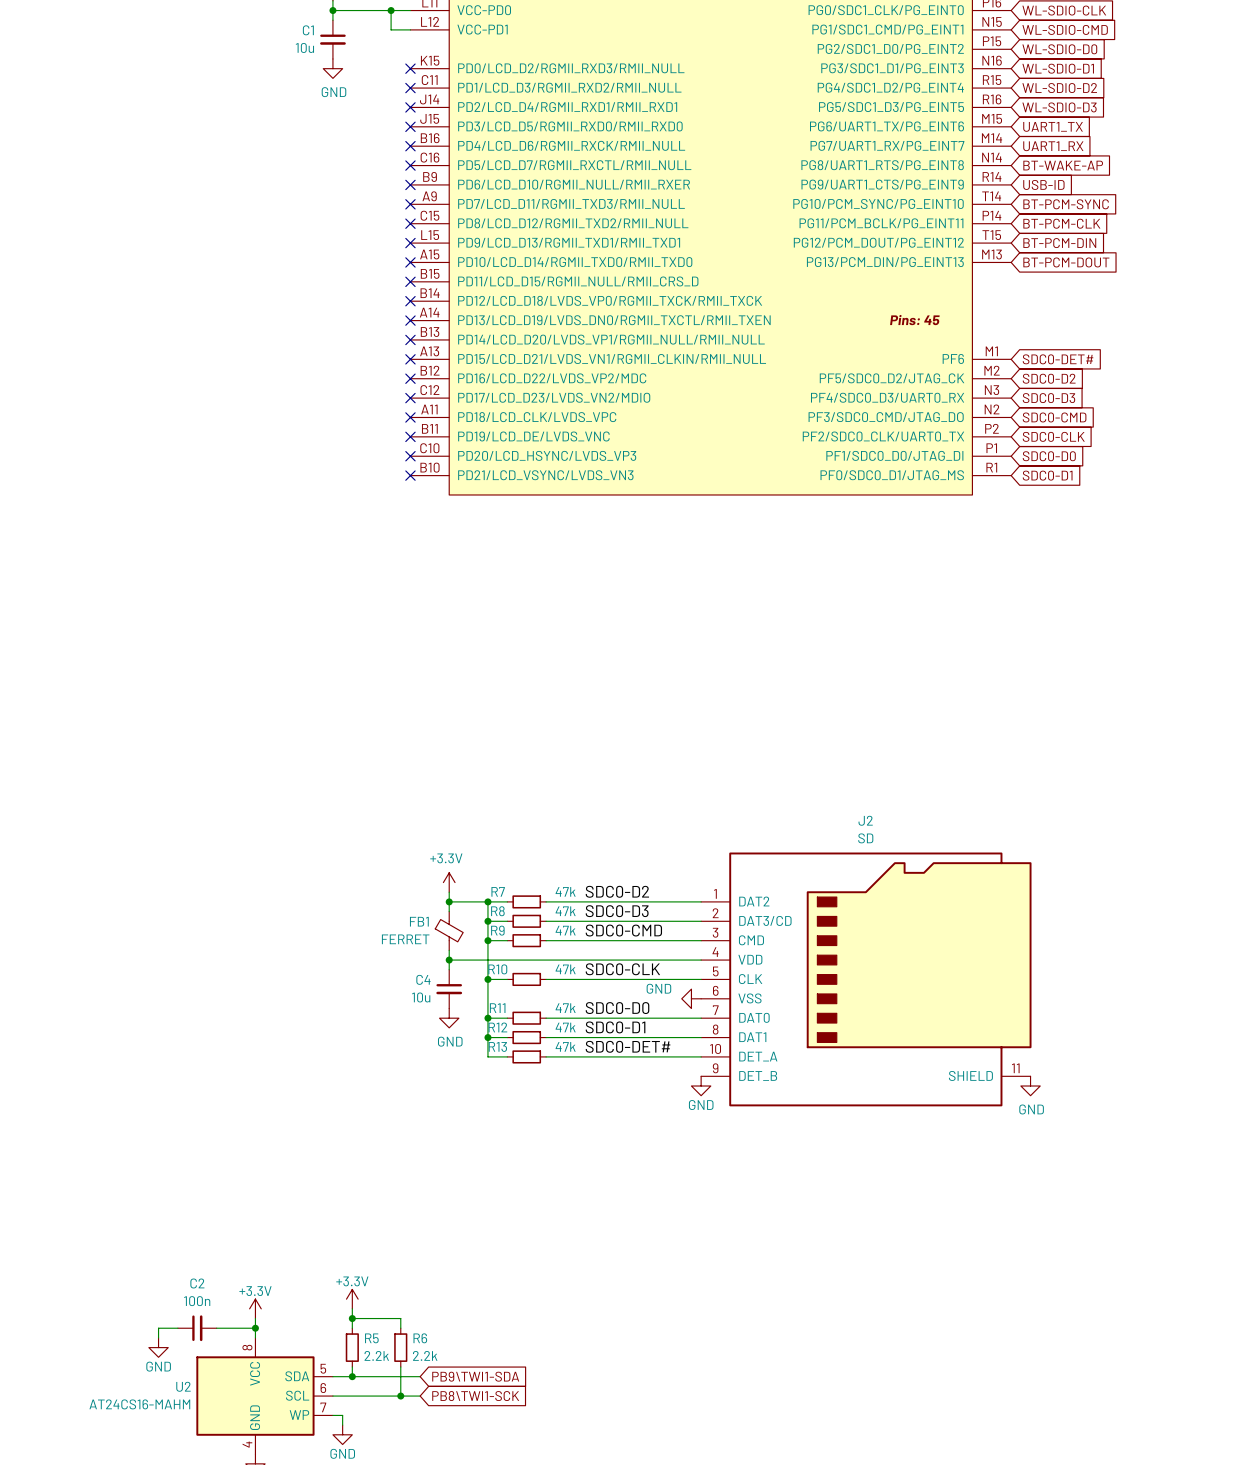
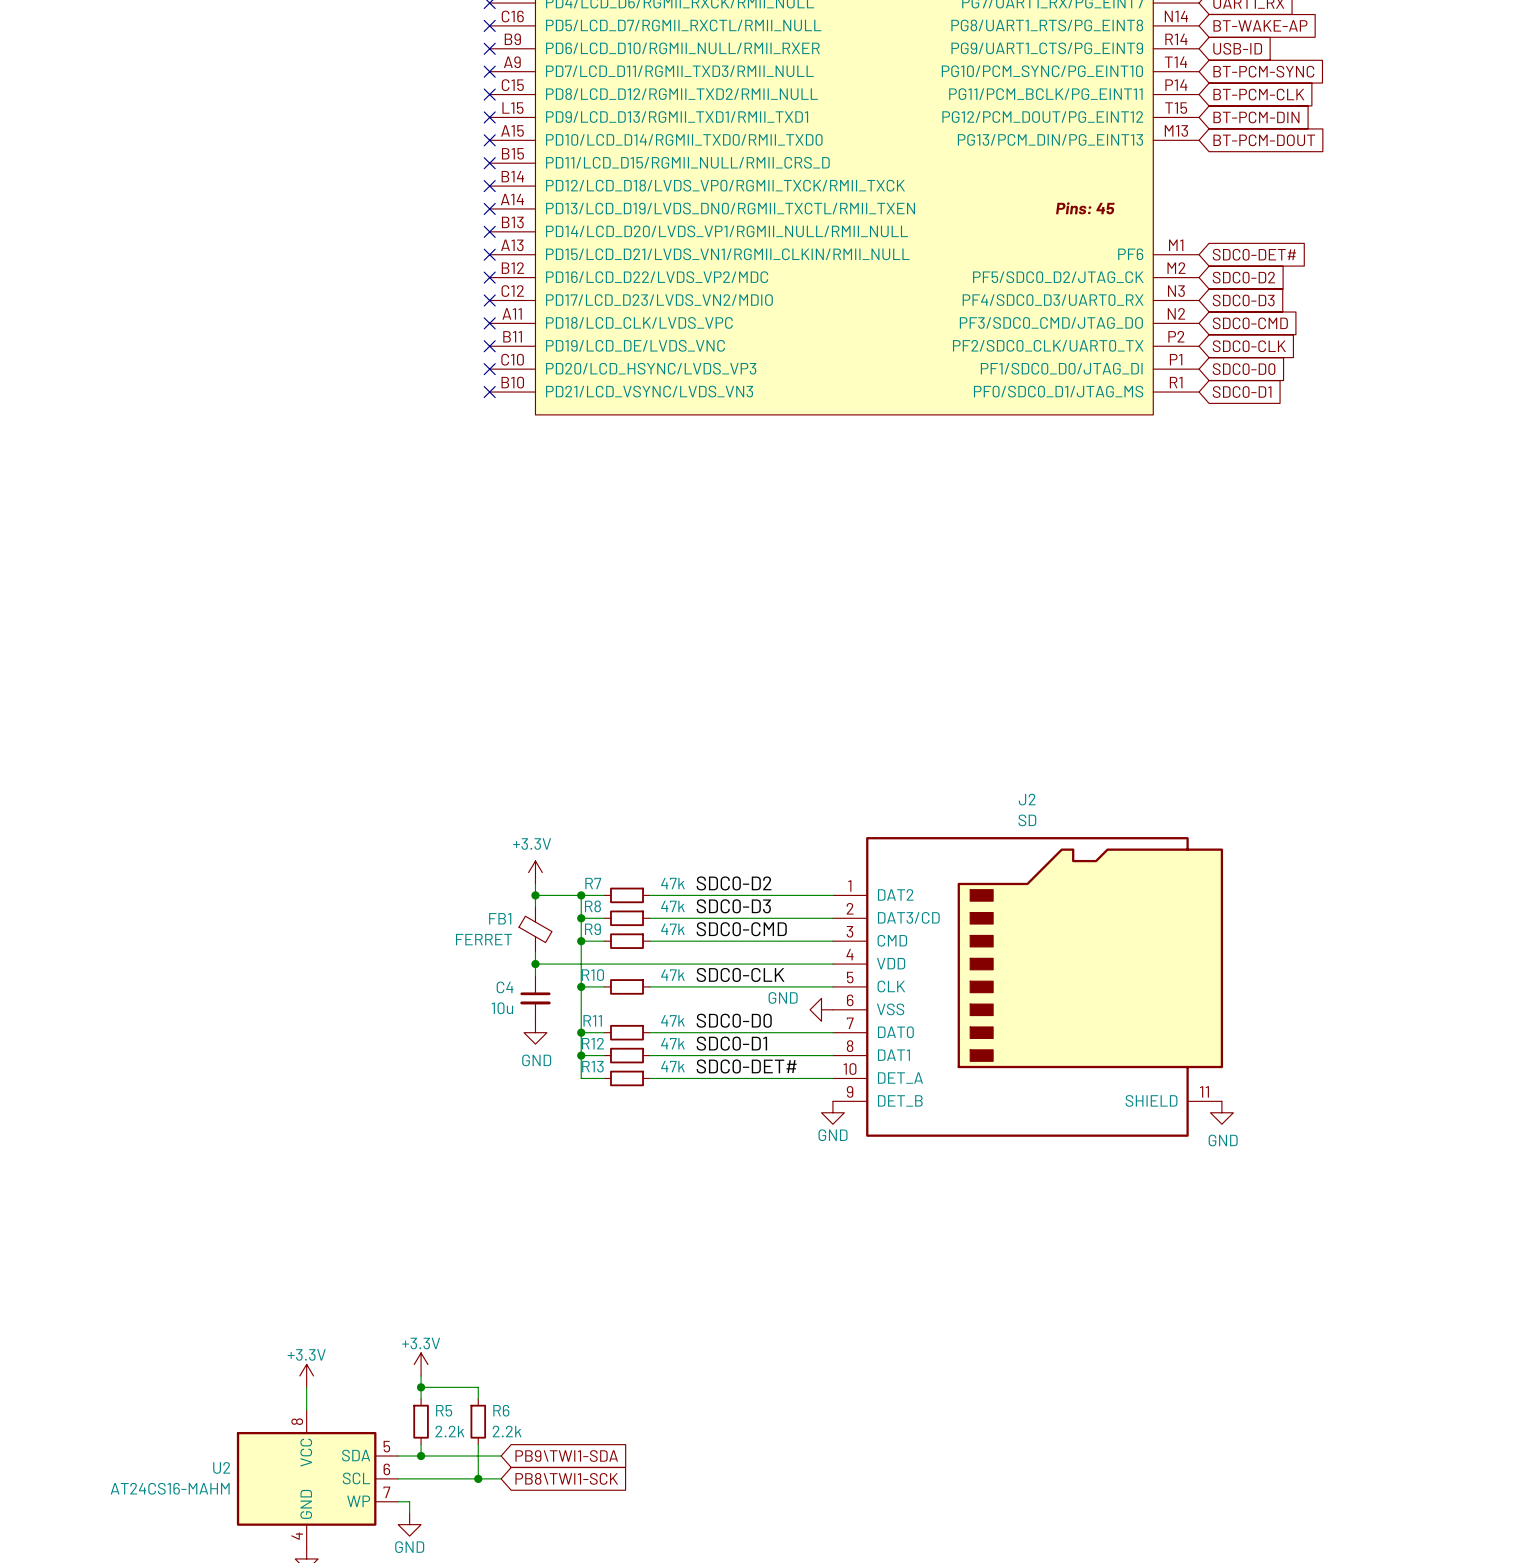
wire: (177, 1328) (158, 1328) (158, 1337) -> none
C2: 100n (197, 1328) -> none
wire: (216, 1328) (255, 1328) -> none
junction: (255, 1328) -> none
power symbol: GND (158, 1347) -> none

